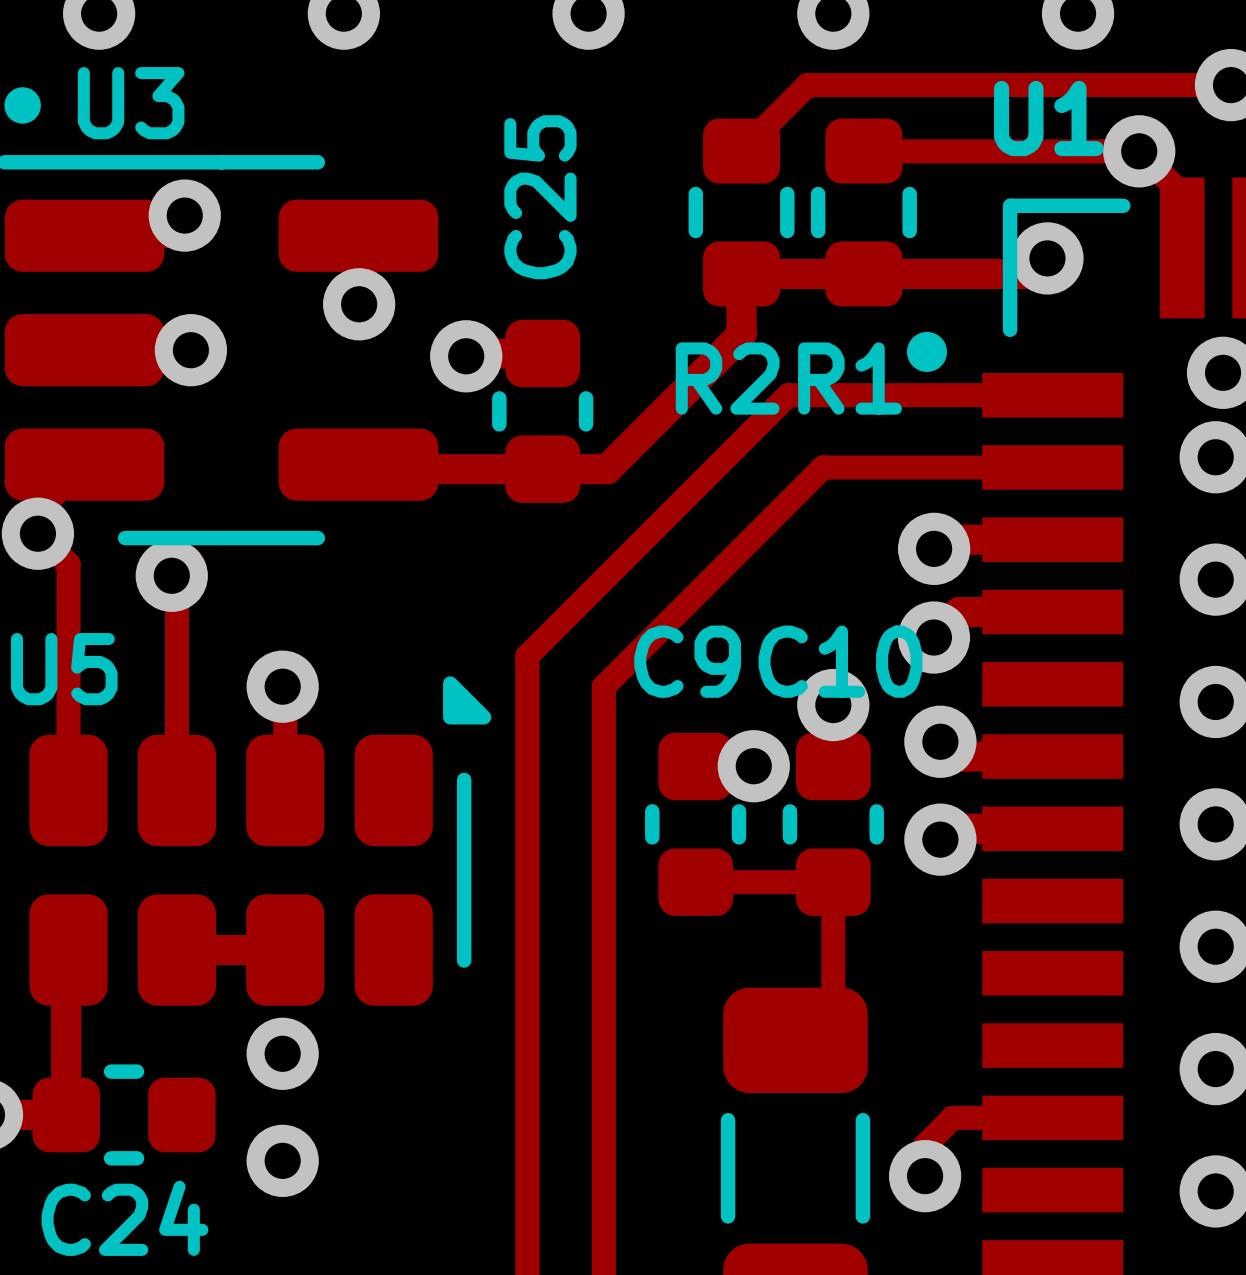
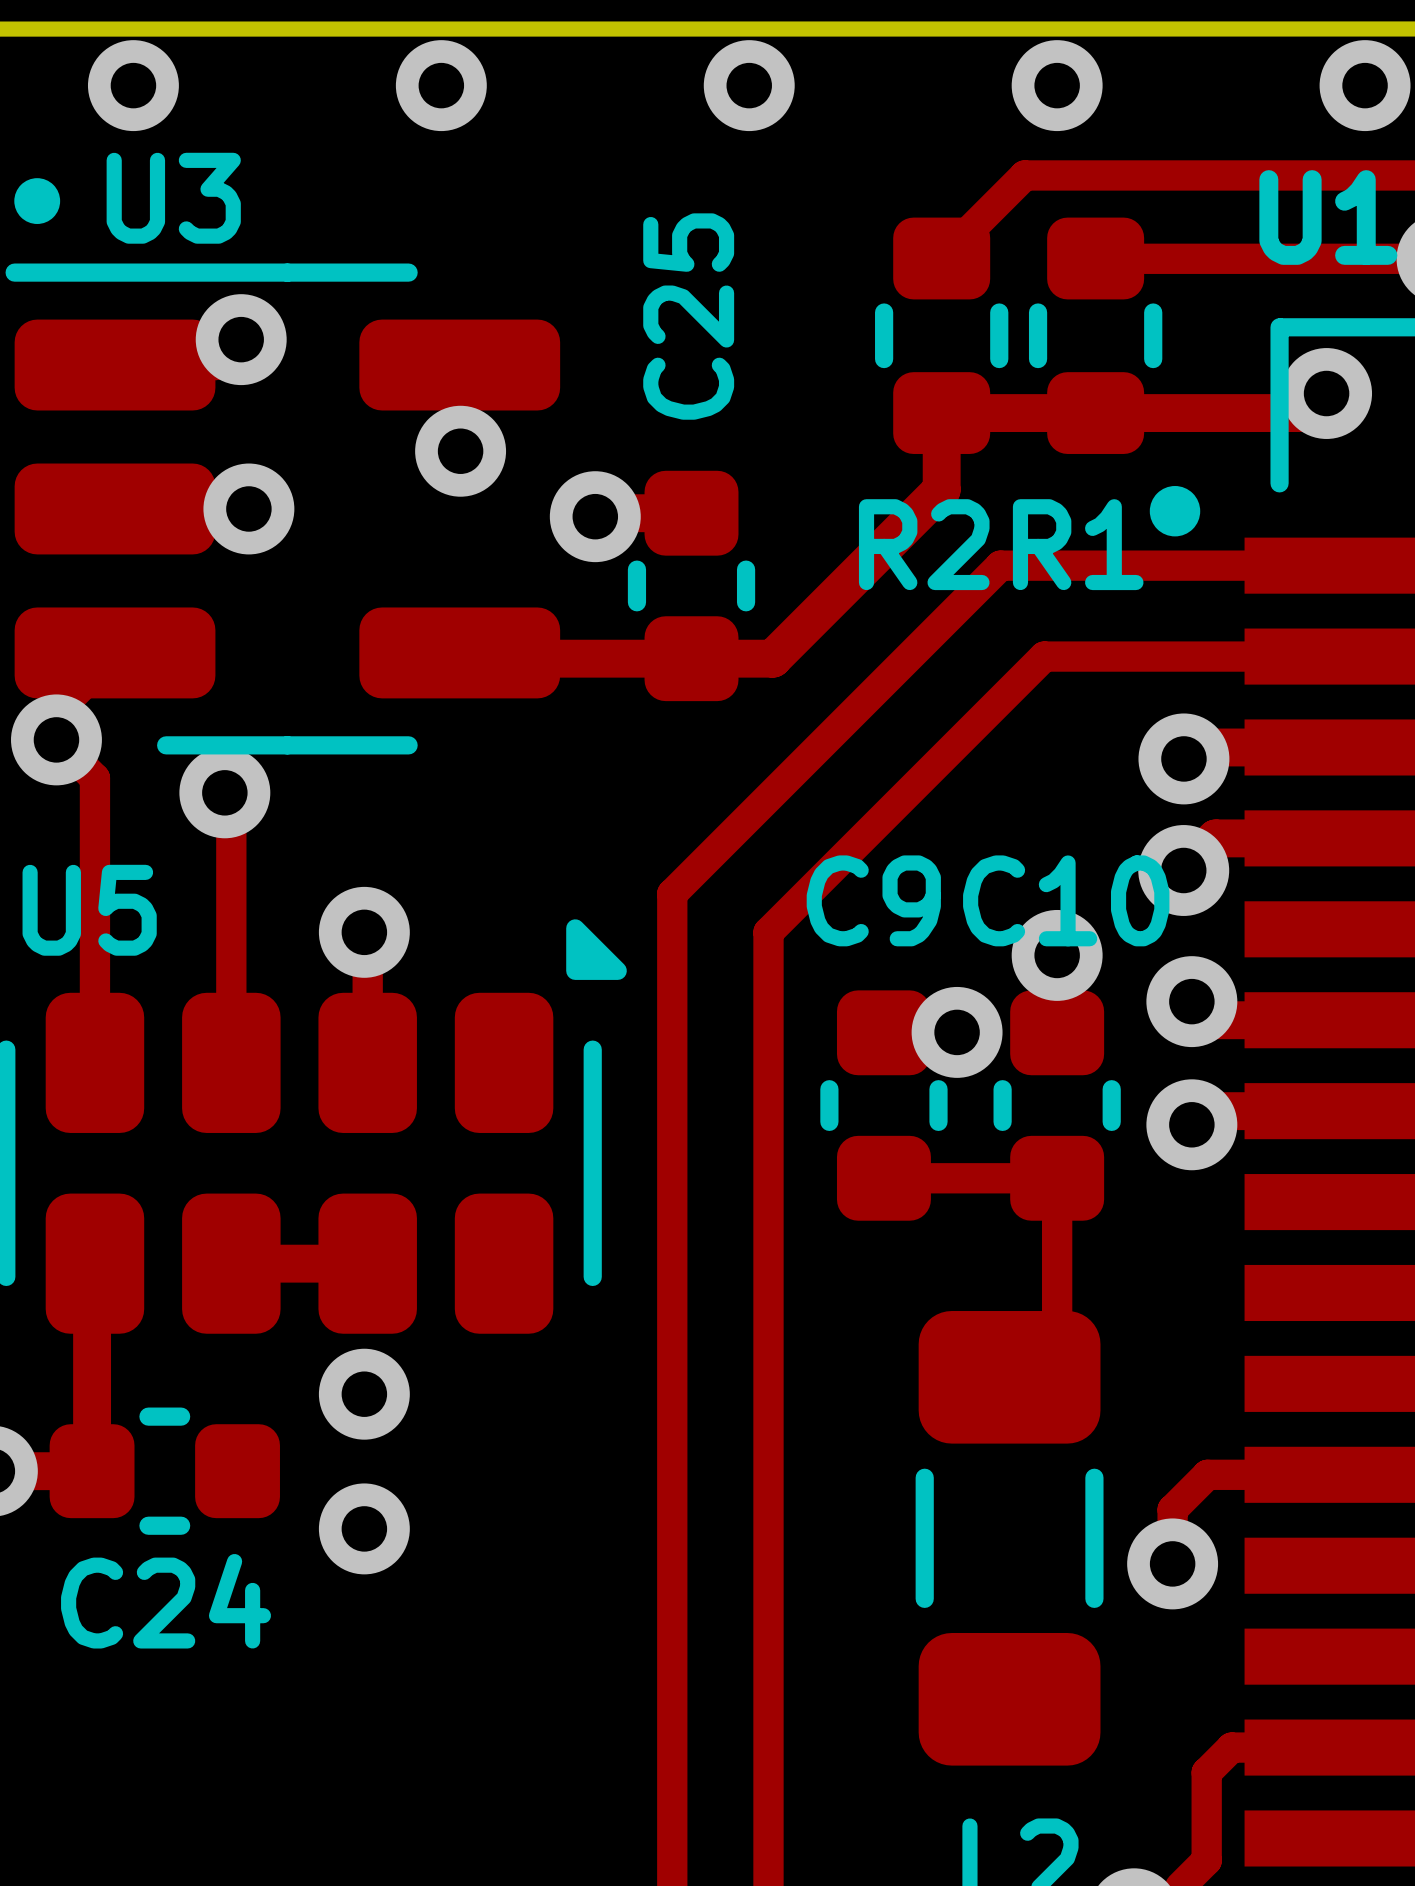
via position: (925, 1176) -> (1172, 1563)

